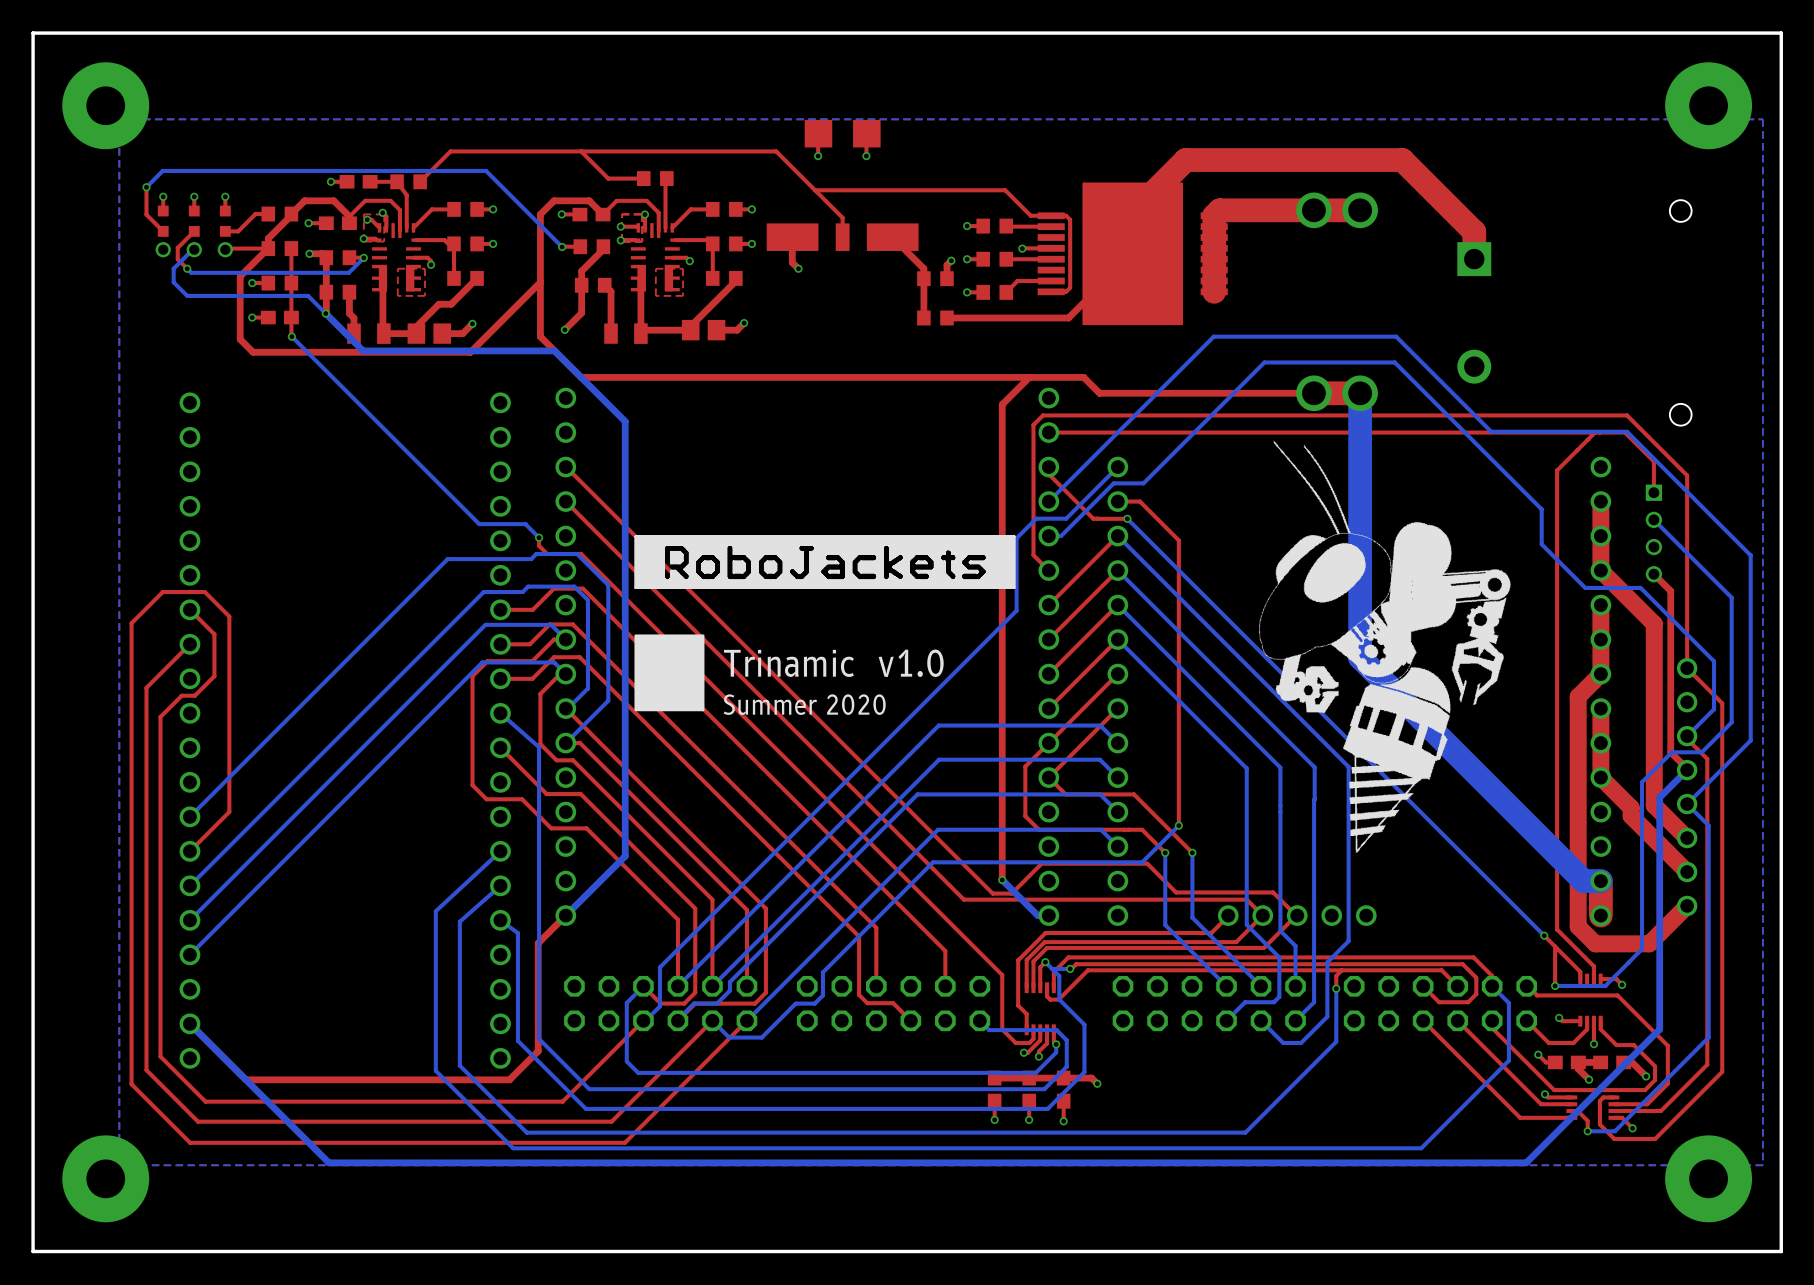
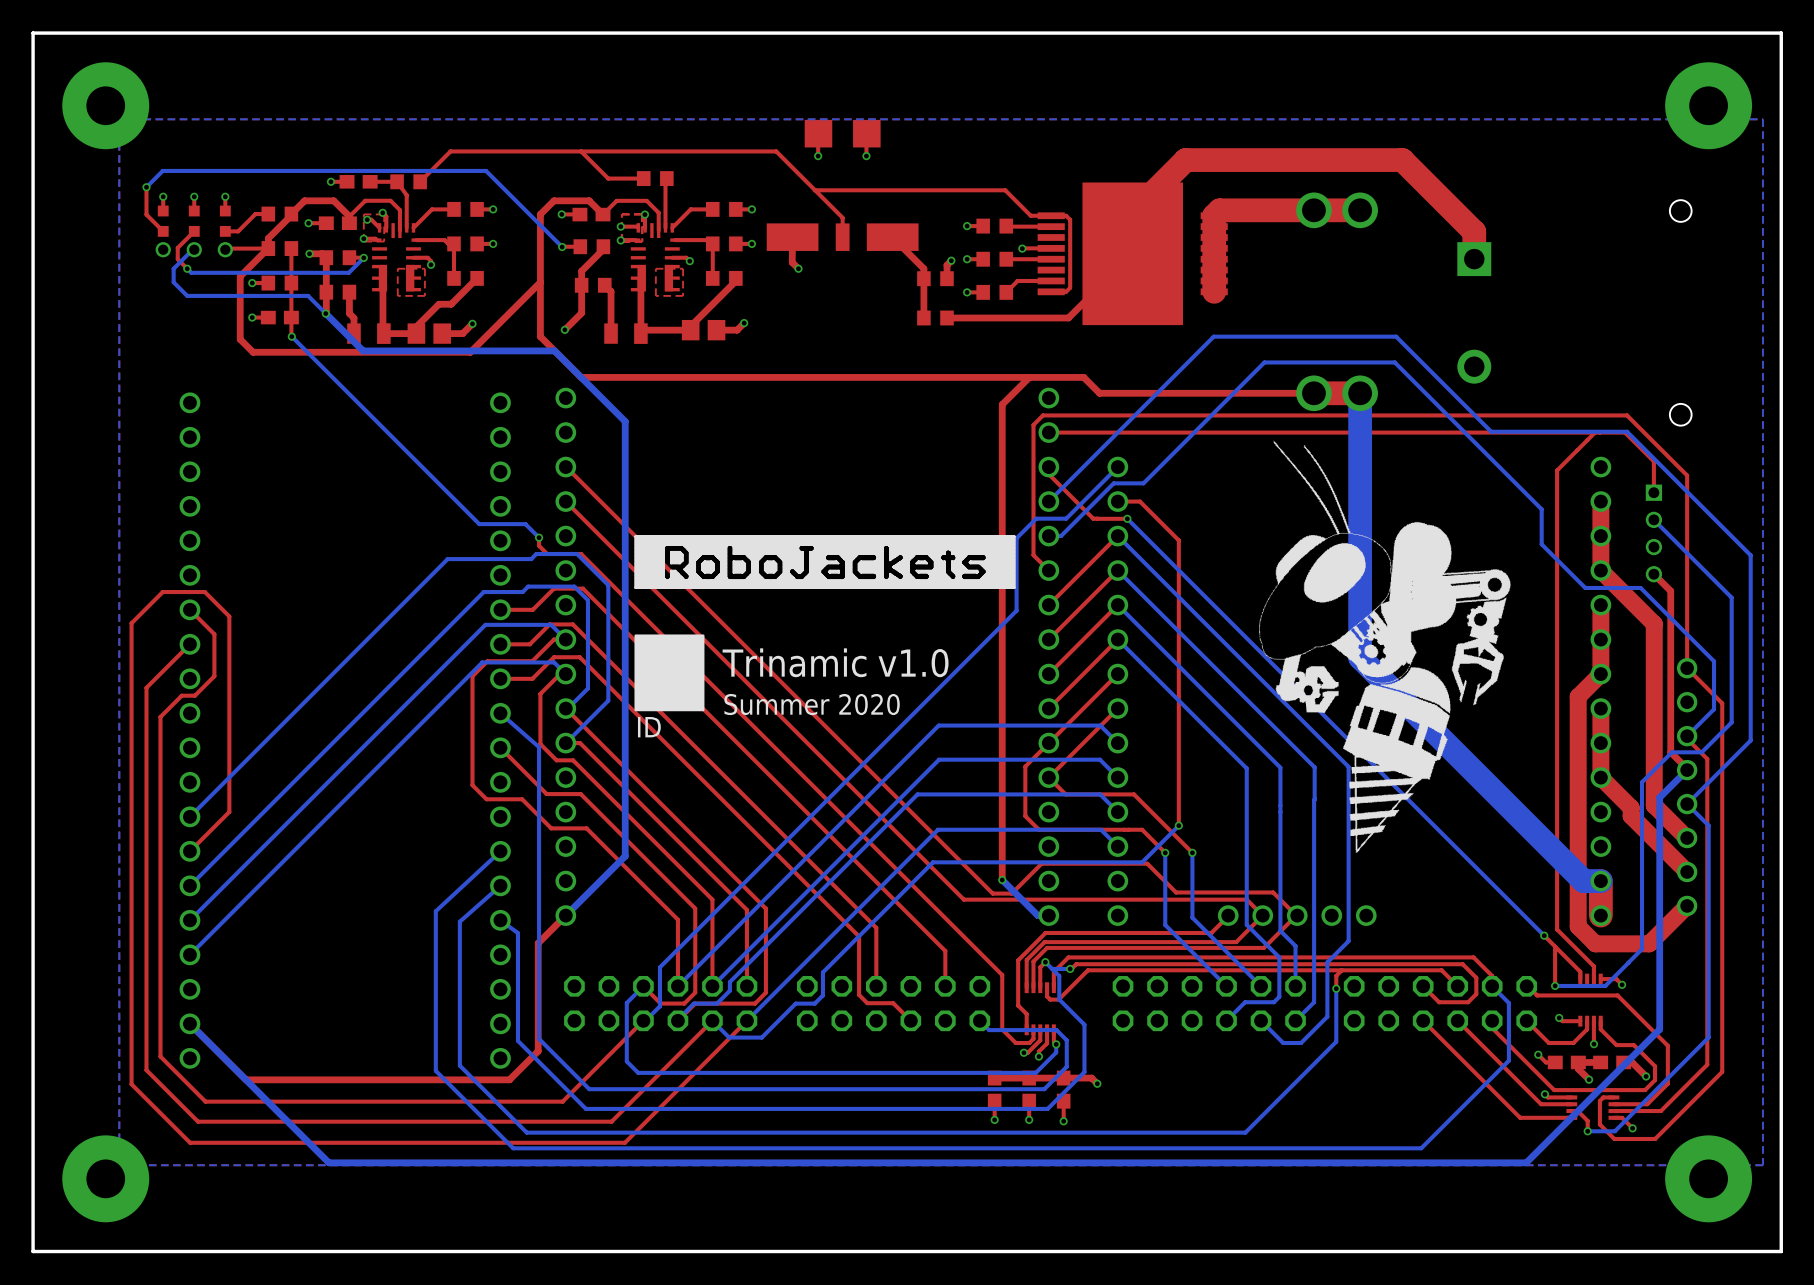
text: none -> ID (649, 727)

